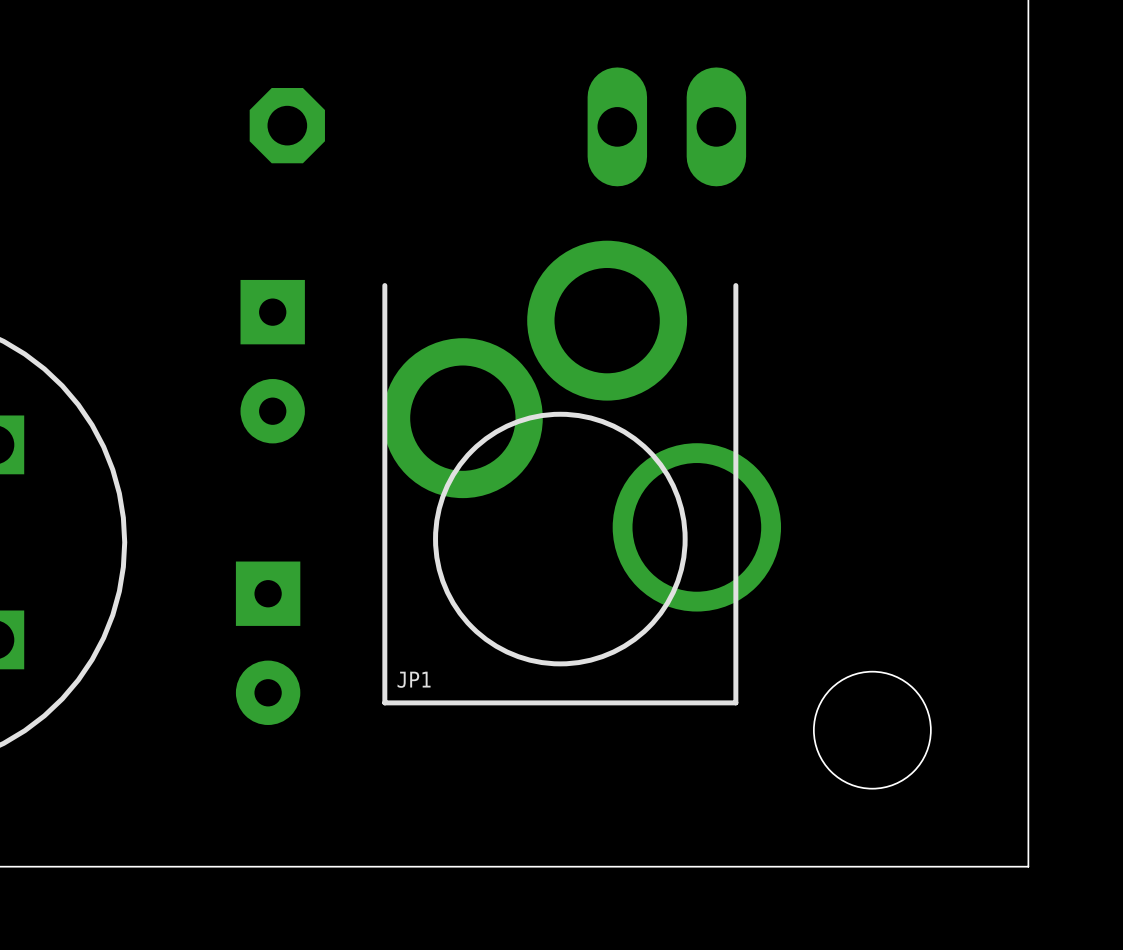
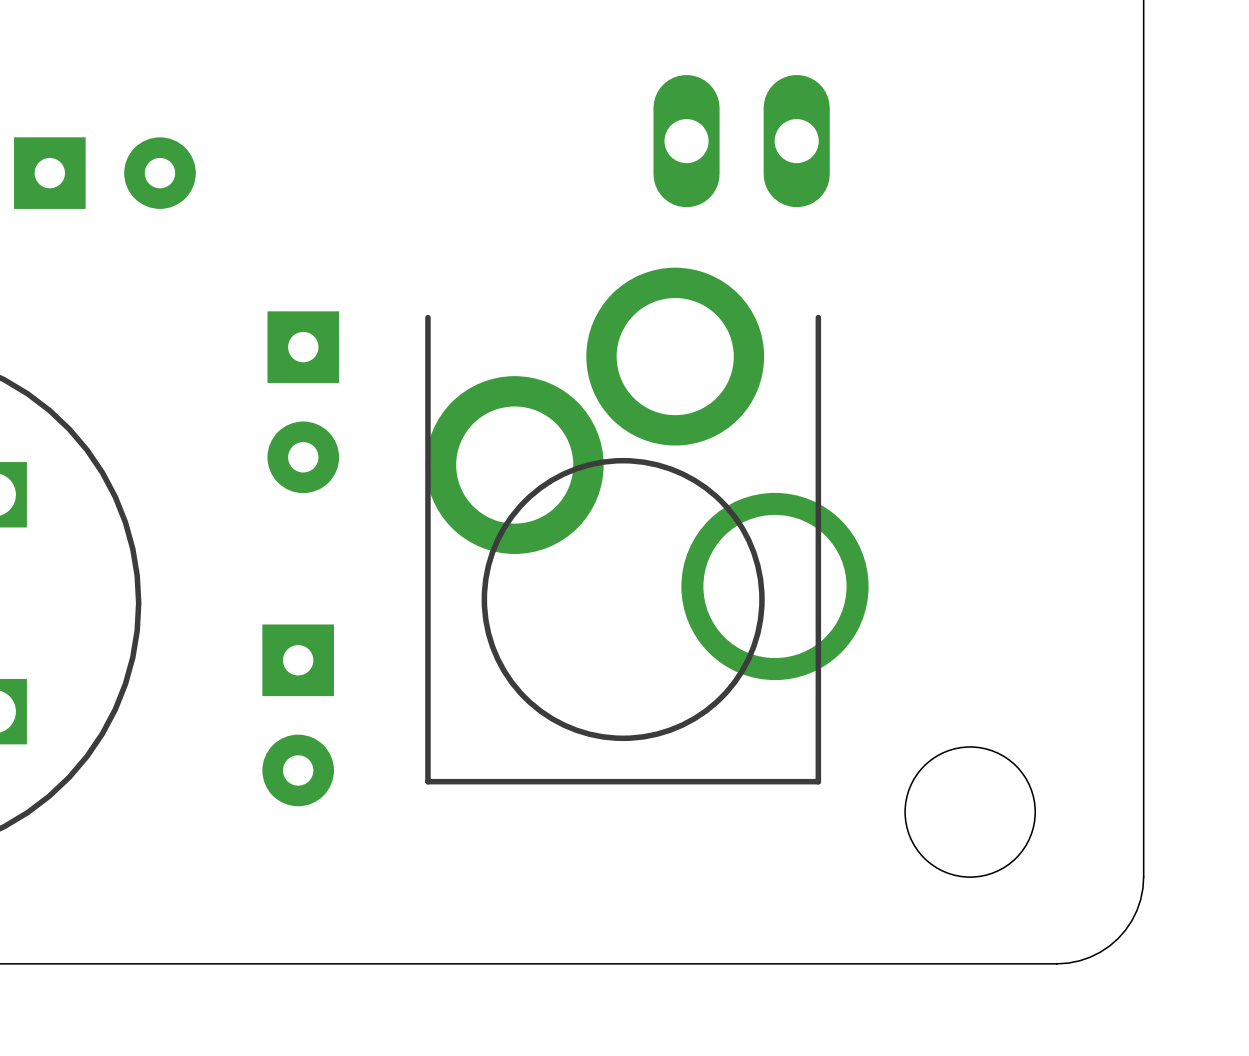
part: (287, 125) -> none
part: none -> (104, 173)
JP1 name: JP1 (414, 679) -> none
board edge: (1028, 788) (1028, 866) (950, 866) -> (1143, 877) (1137, 910) (1118, 938) (1090, 957) (1056, 963)

